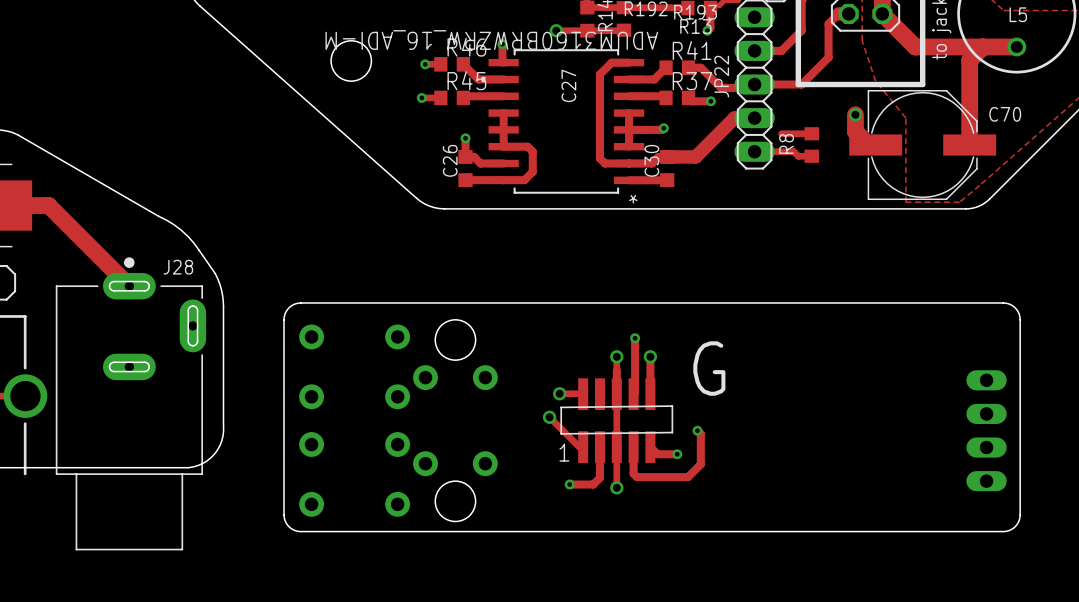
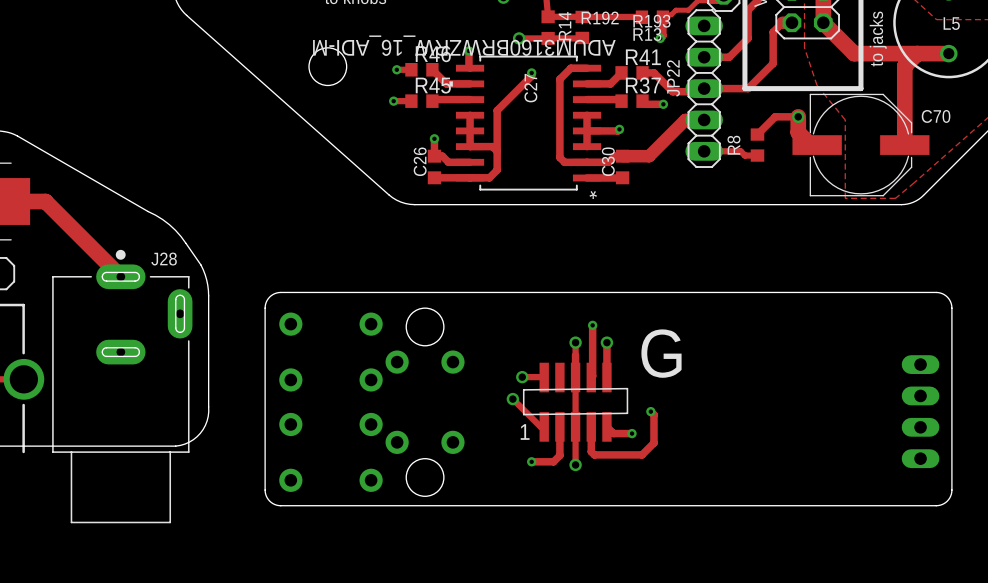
track: none -> (531, 72) (531, 76) (497, 110) (497, 151)
via: none -> (531, 72)
track: (781, 133) (811, 133) -> (798, 116) (775, 116) (757, 134)

